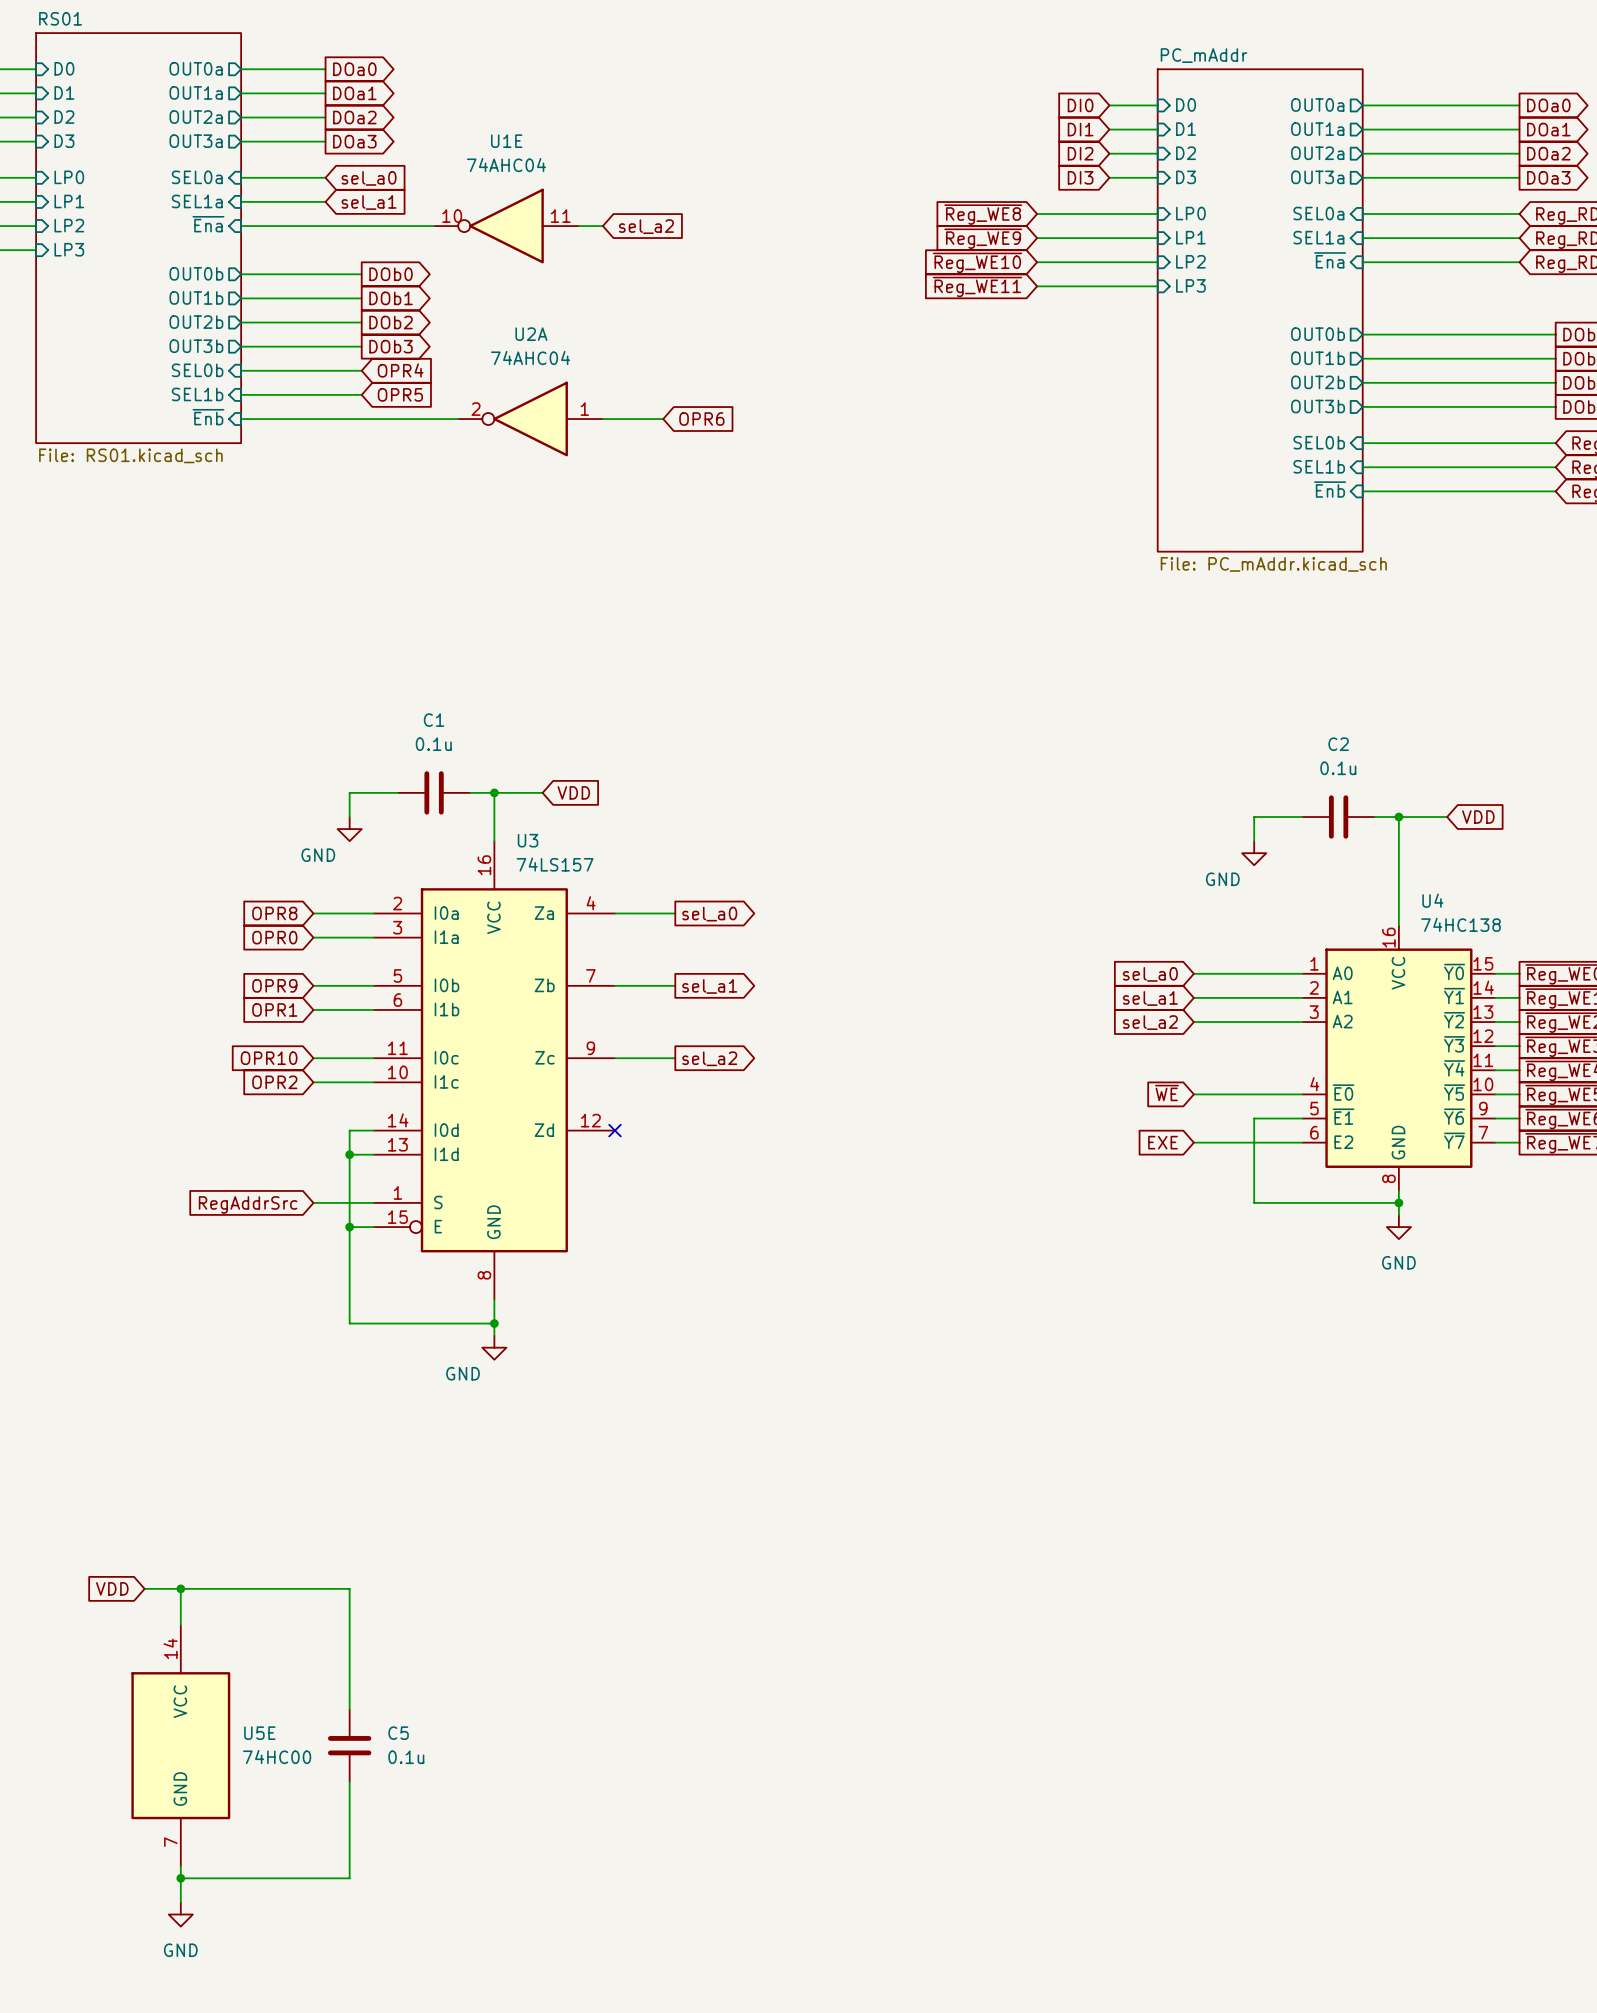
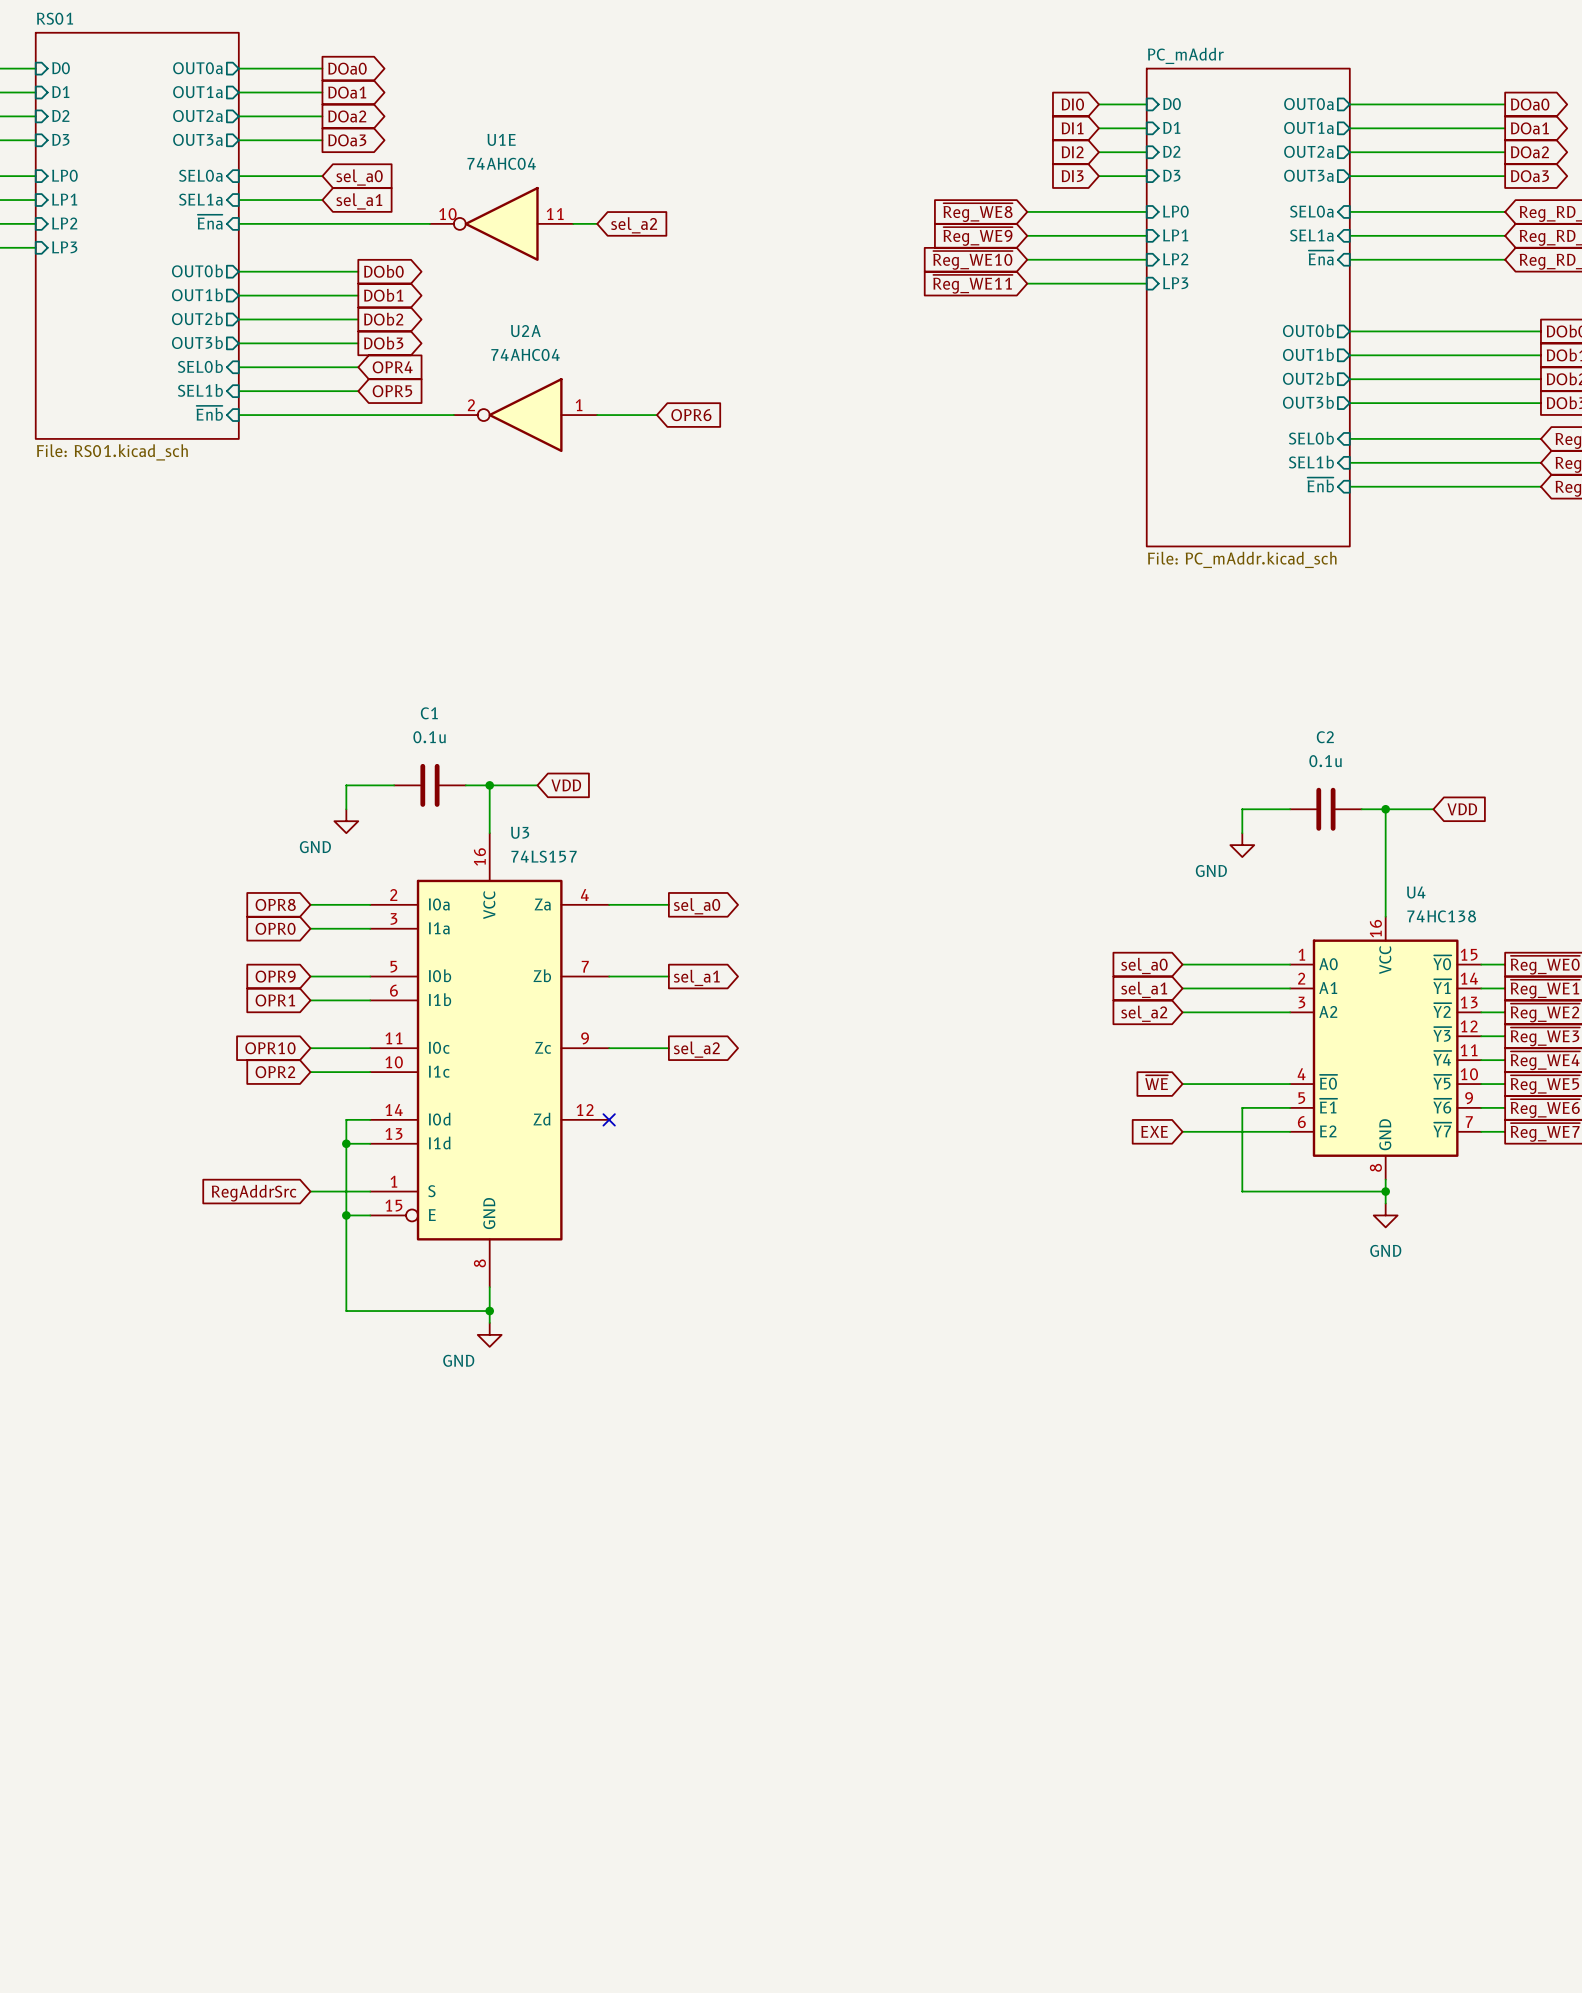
global label: VDD (112, 1588) -> none
wire: (144, 1588) (349, 1588) (349, 1709) -> none
wire: (180, 1588) (180, 1625) -> none
junction: (180, 1588) -> none
U5E: 74HC00 (180, 1745) -> none
C5: 0.1u (349, 1745) -> none
wire: (349, 1781) (349, 1878) (180, 1878) -> none
wire: (180, 1866) (180, 1902) -> none
junction: (180, 1878) -> none
power symbol: GND (180, 1914) -> none

